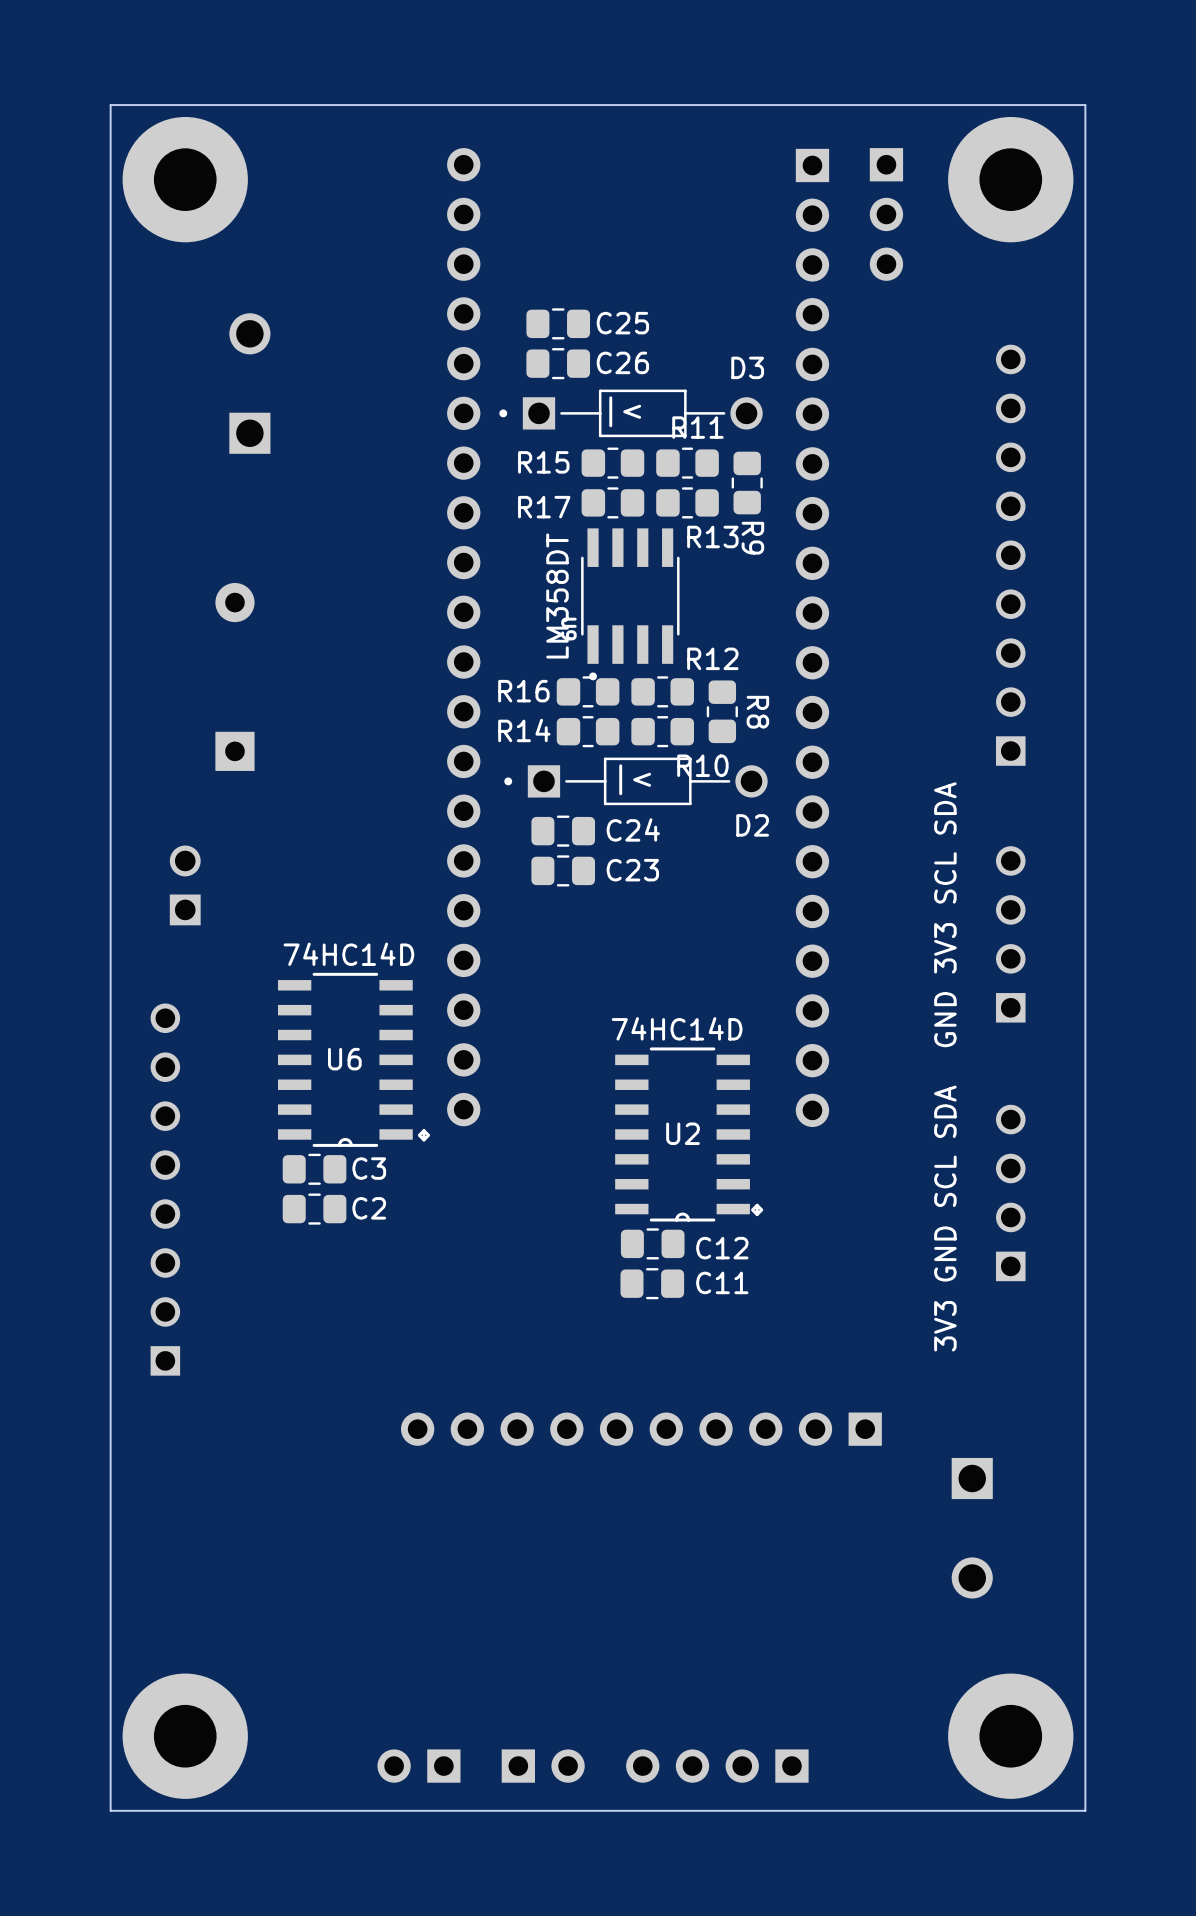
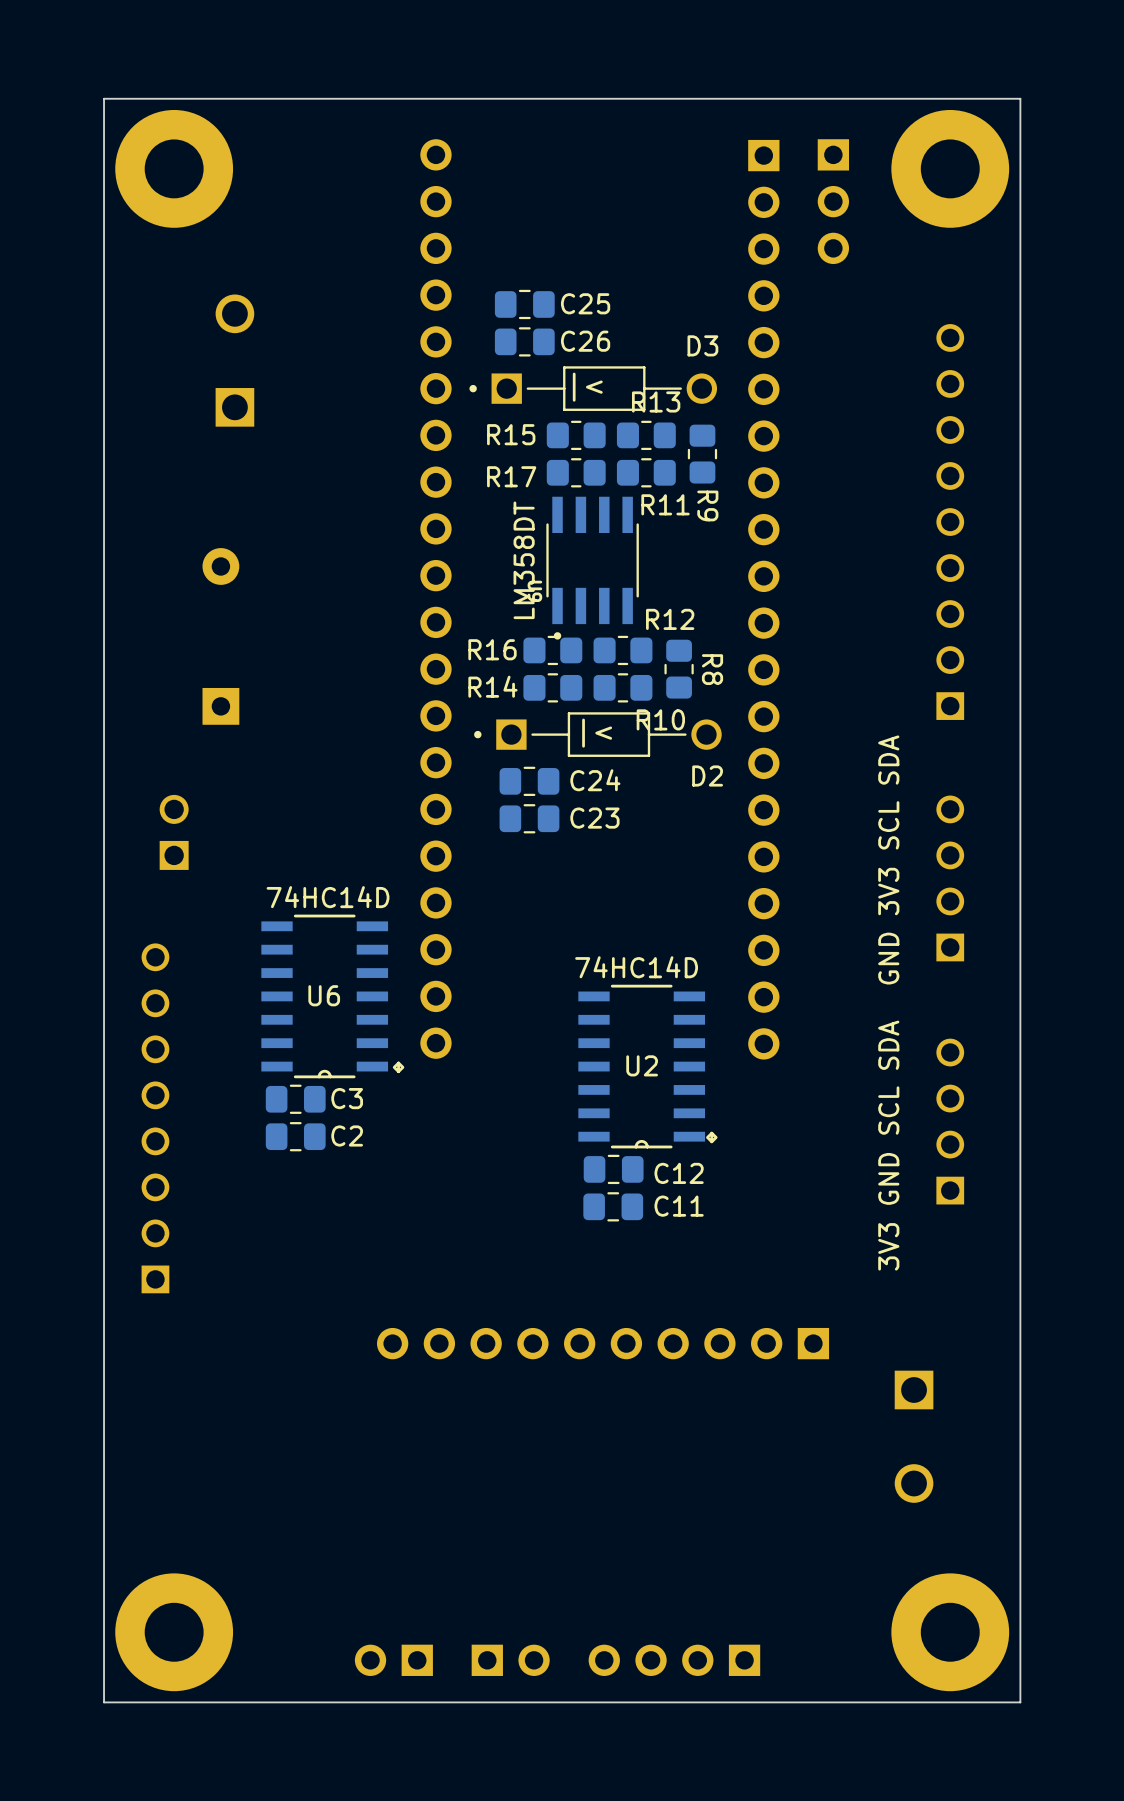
R11 name position: R11 (697, 427) -> R11 (665, 504)
R13 name position: R13 (712, 536) -> R13 (656, 401)

